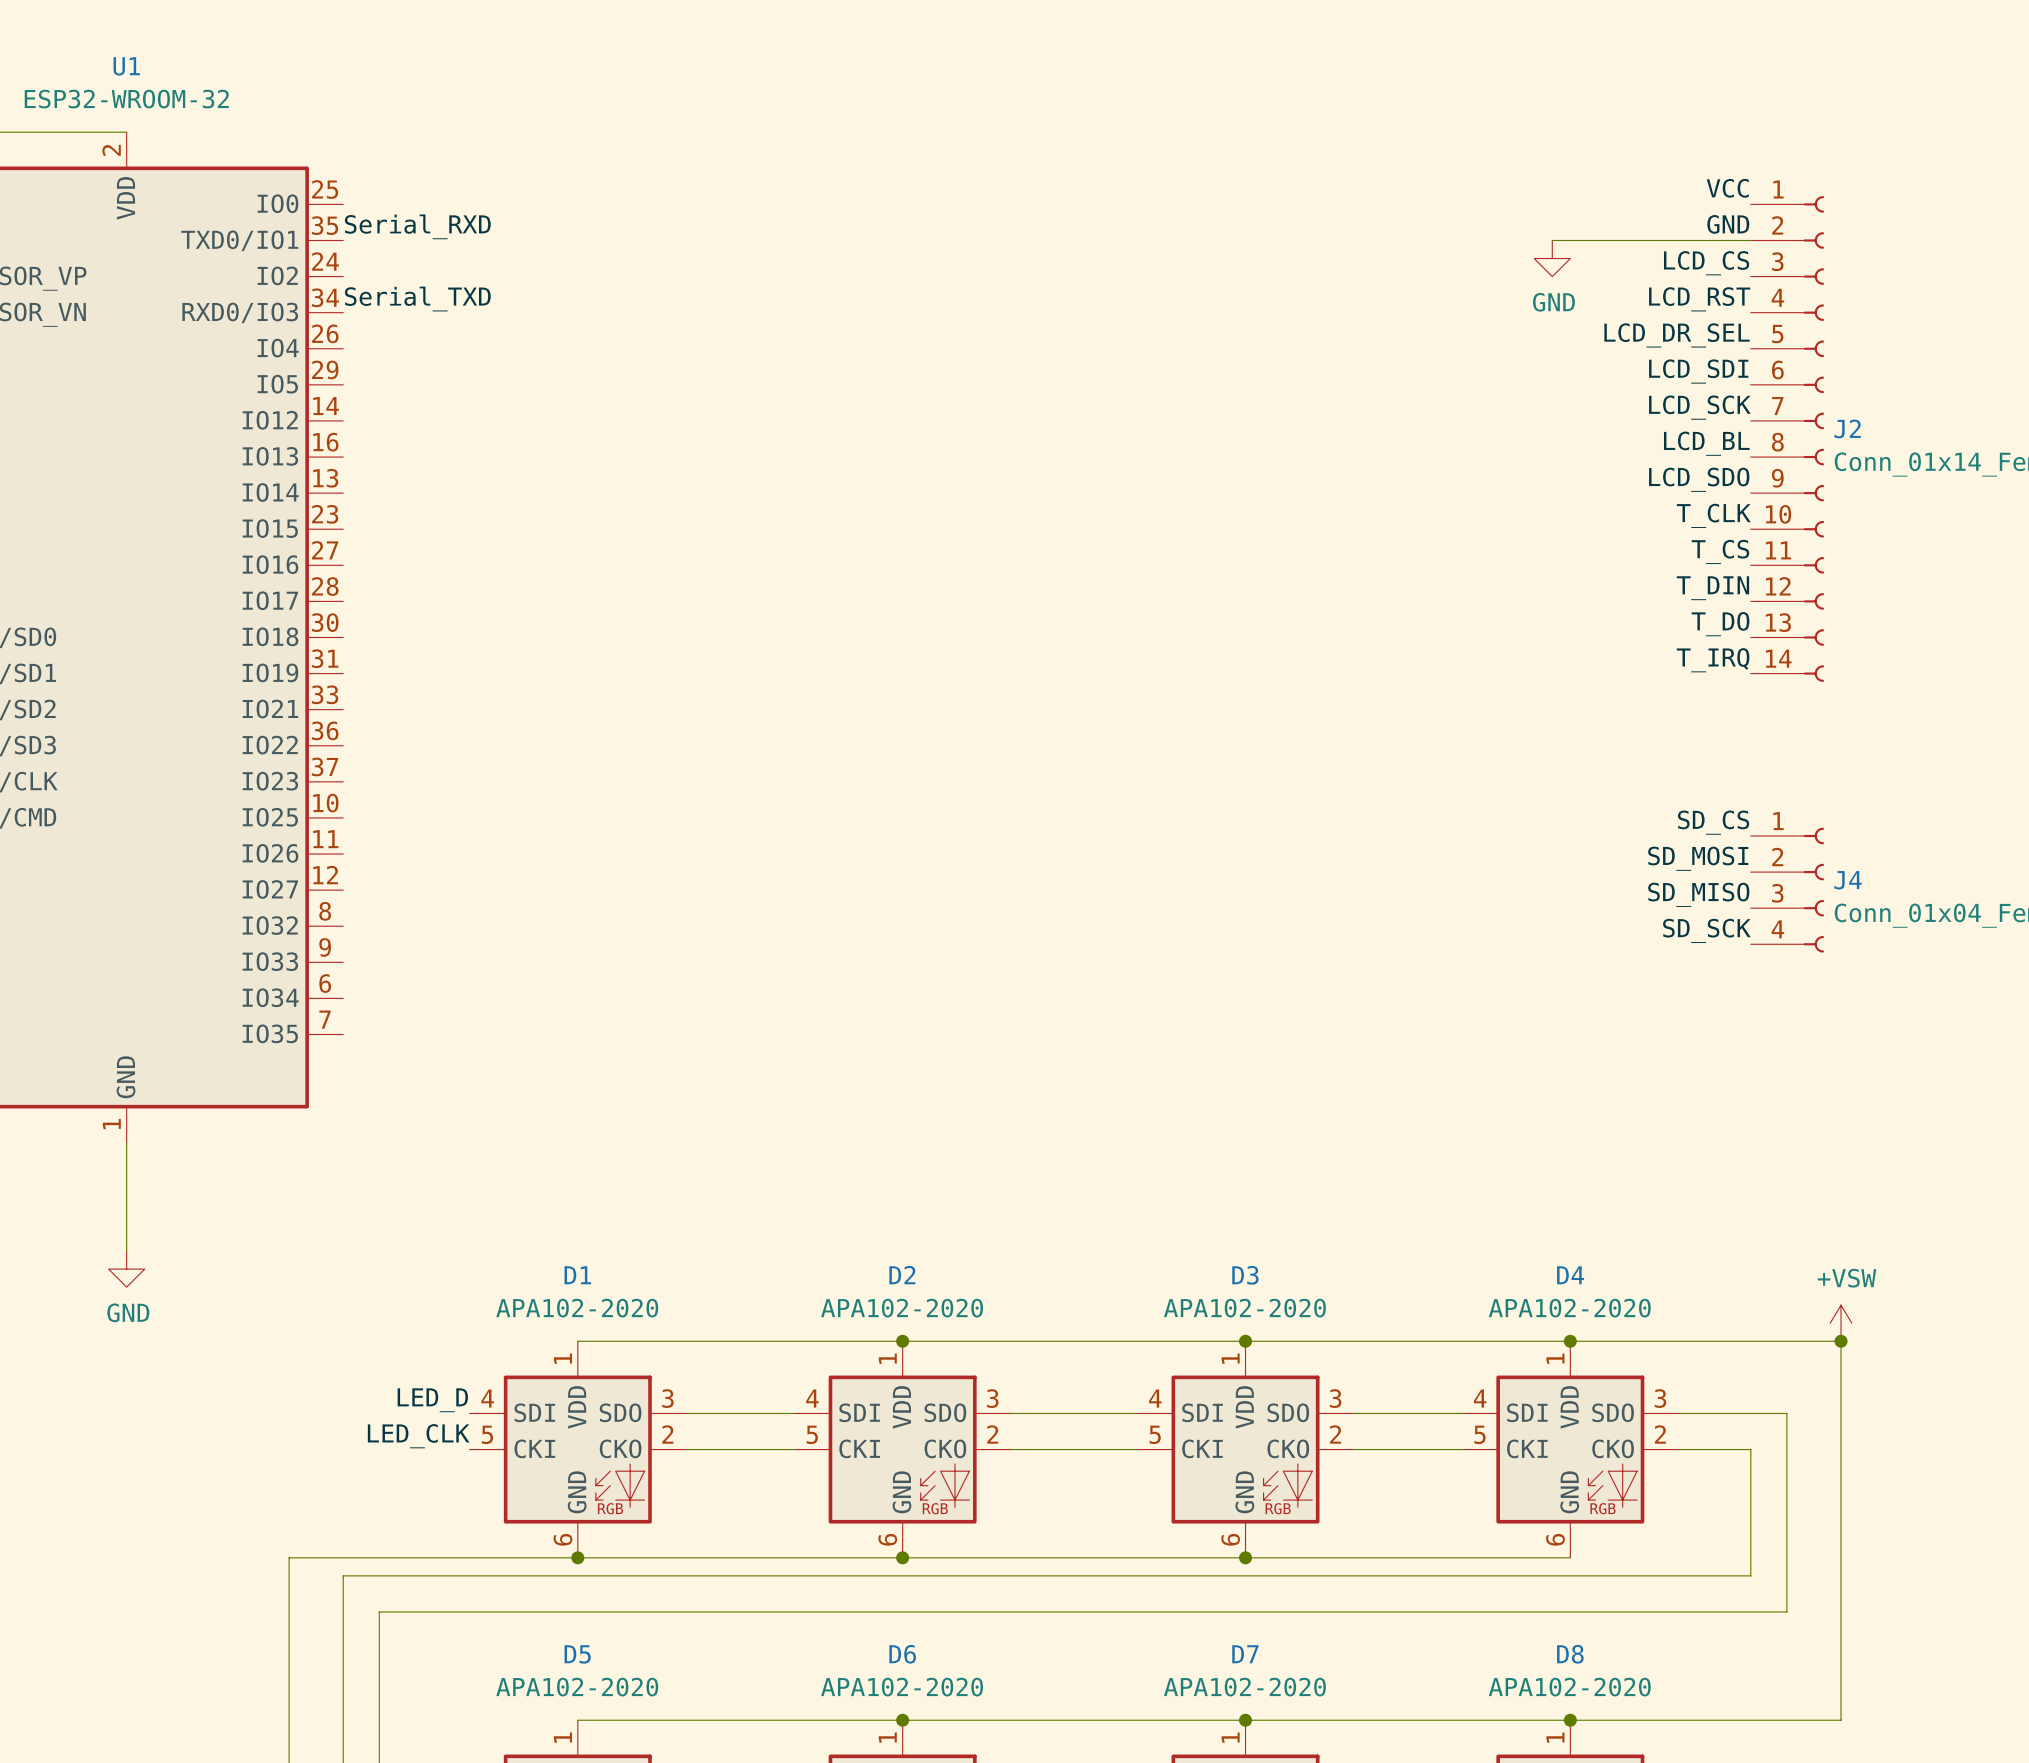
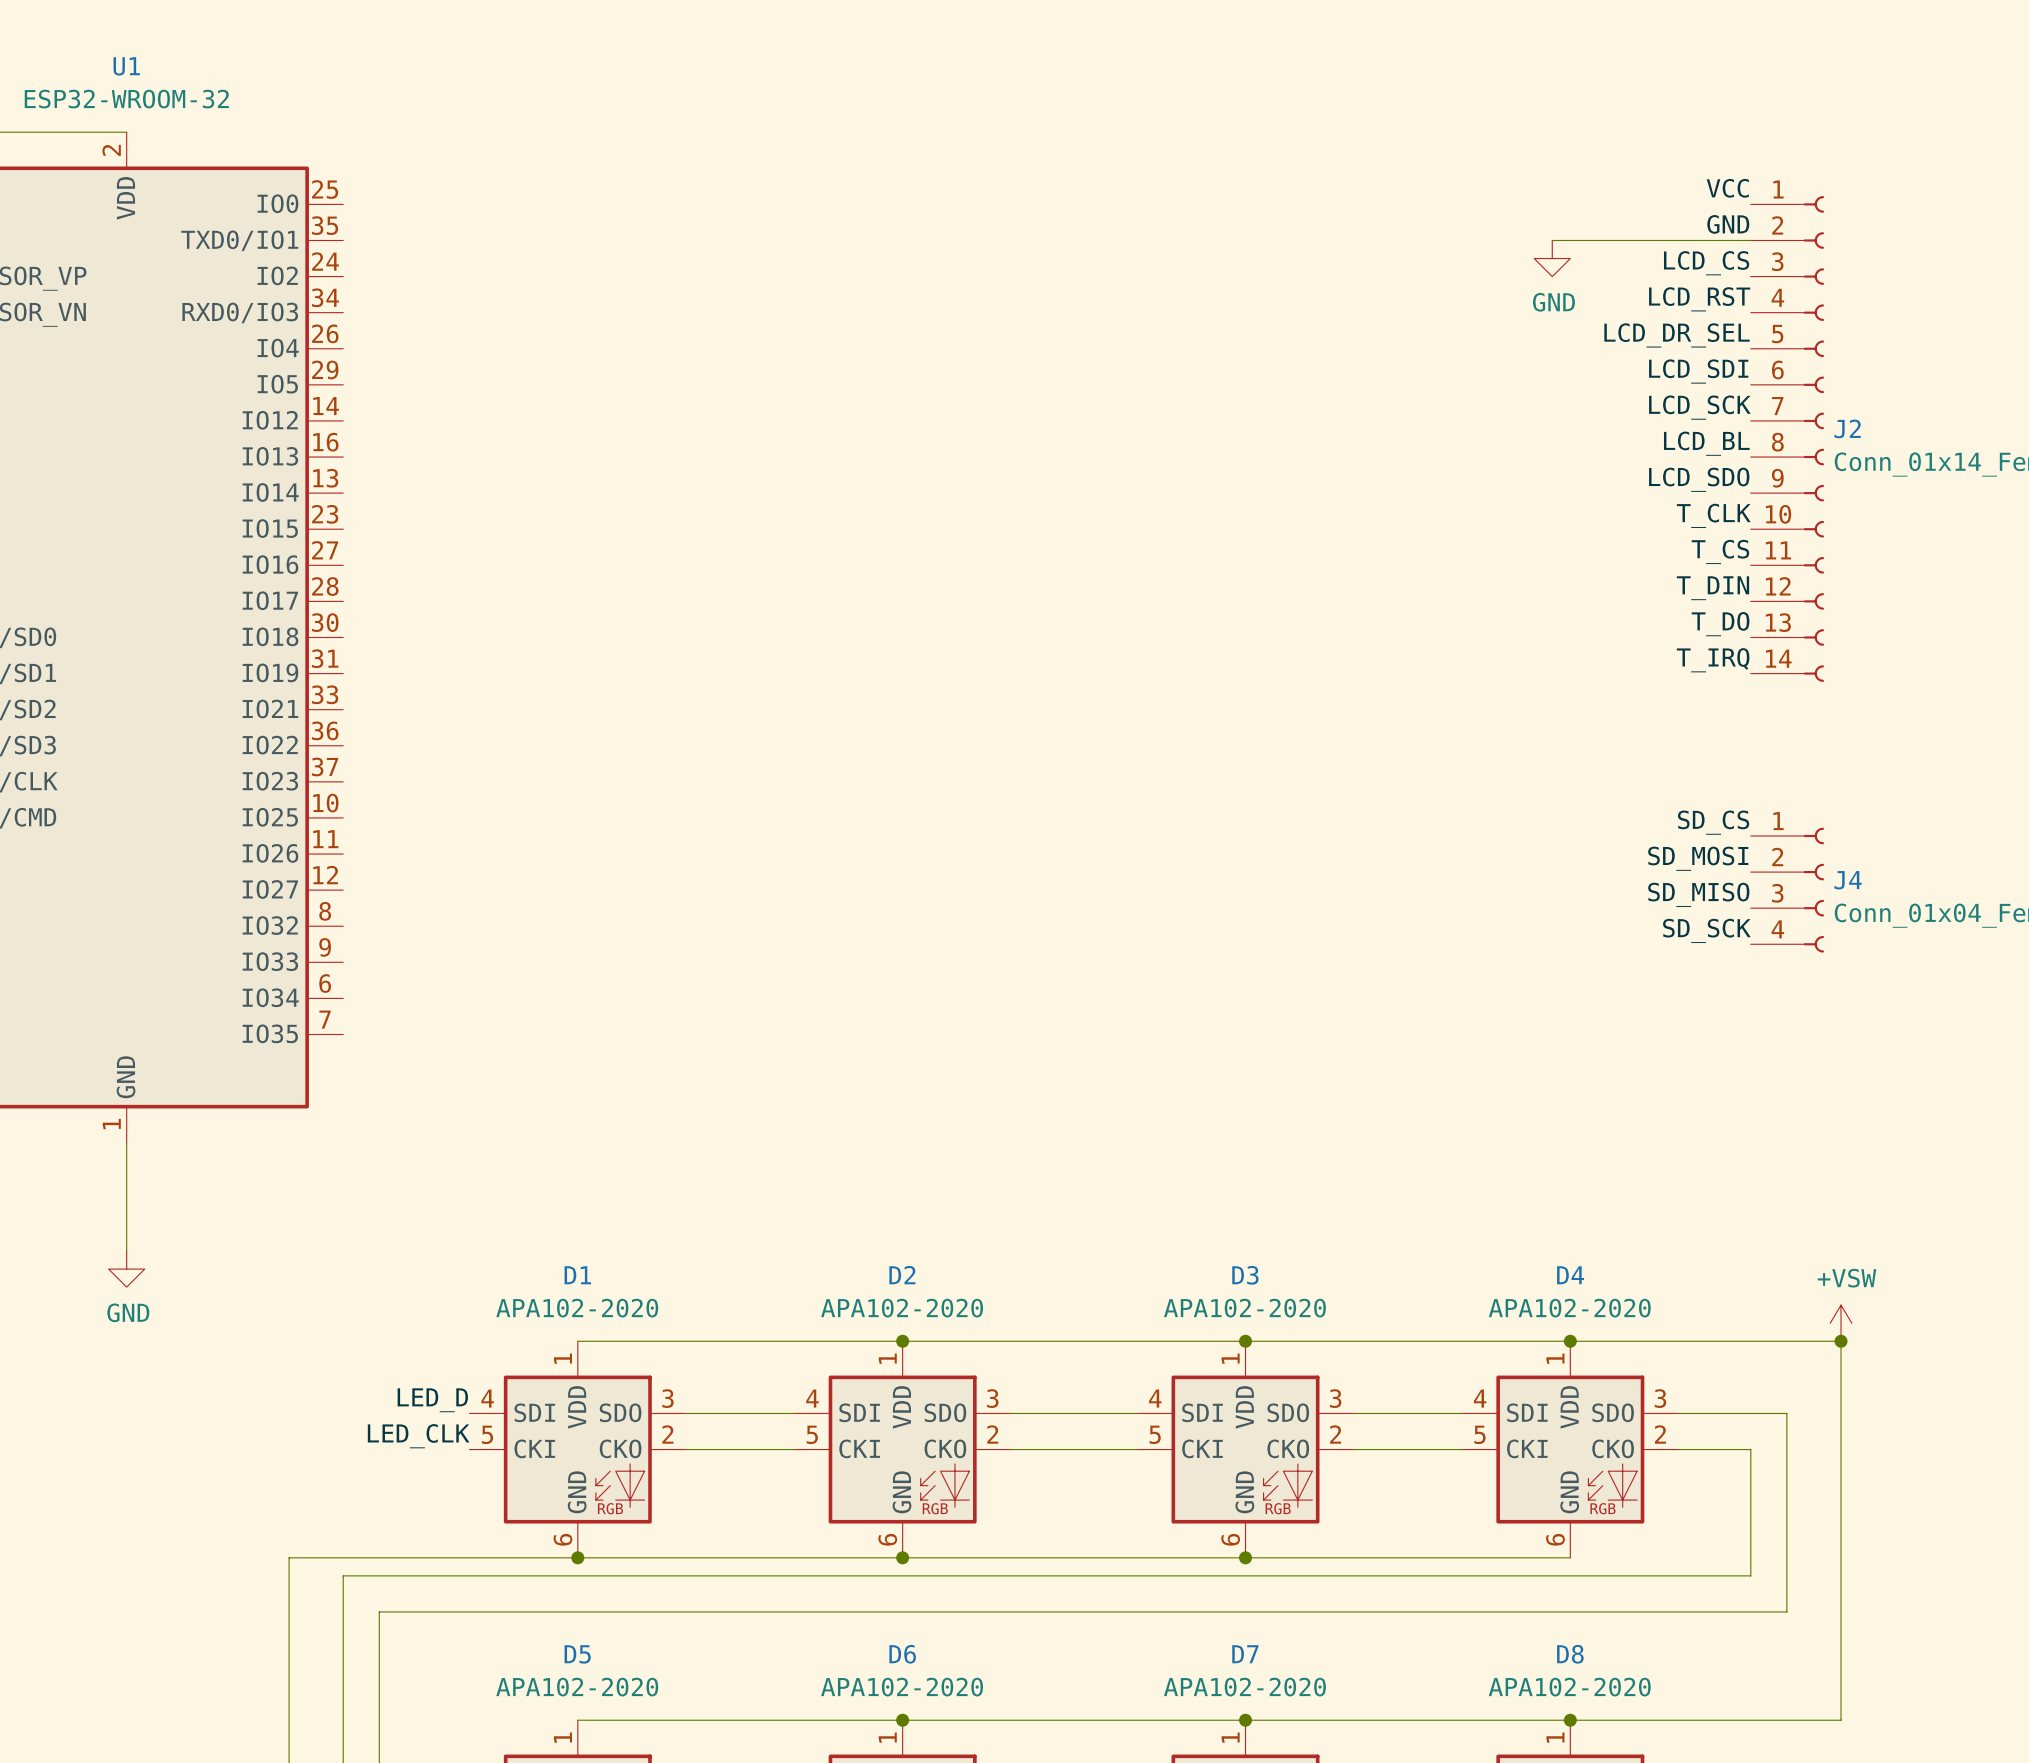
label: Serial_RXD (417, 226) -> none
label: Serial_TXD (417, 299) -> none

